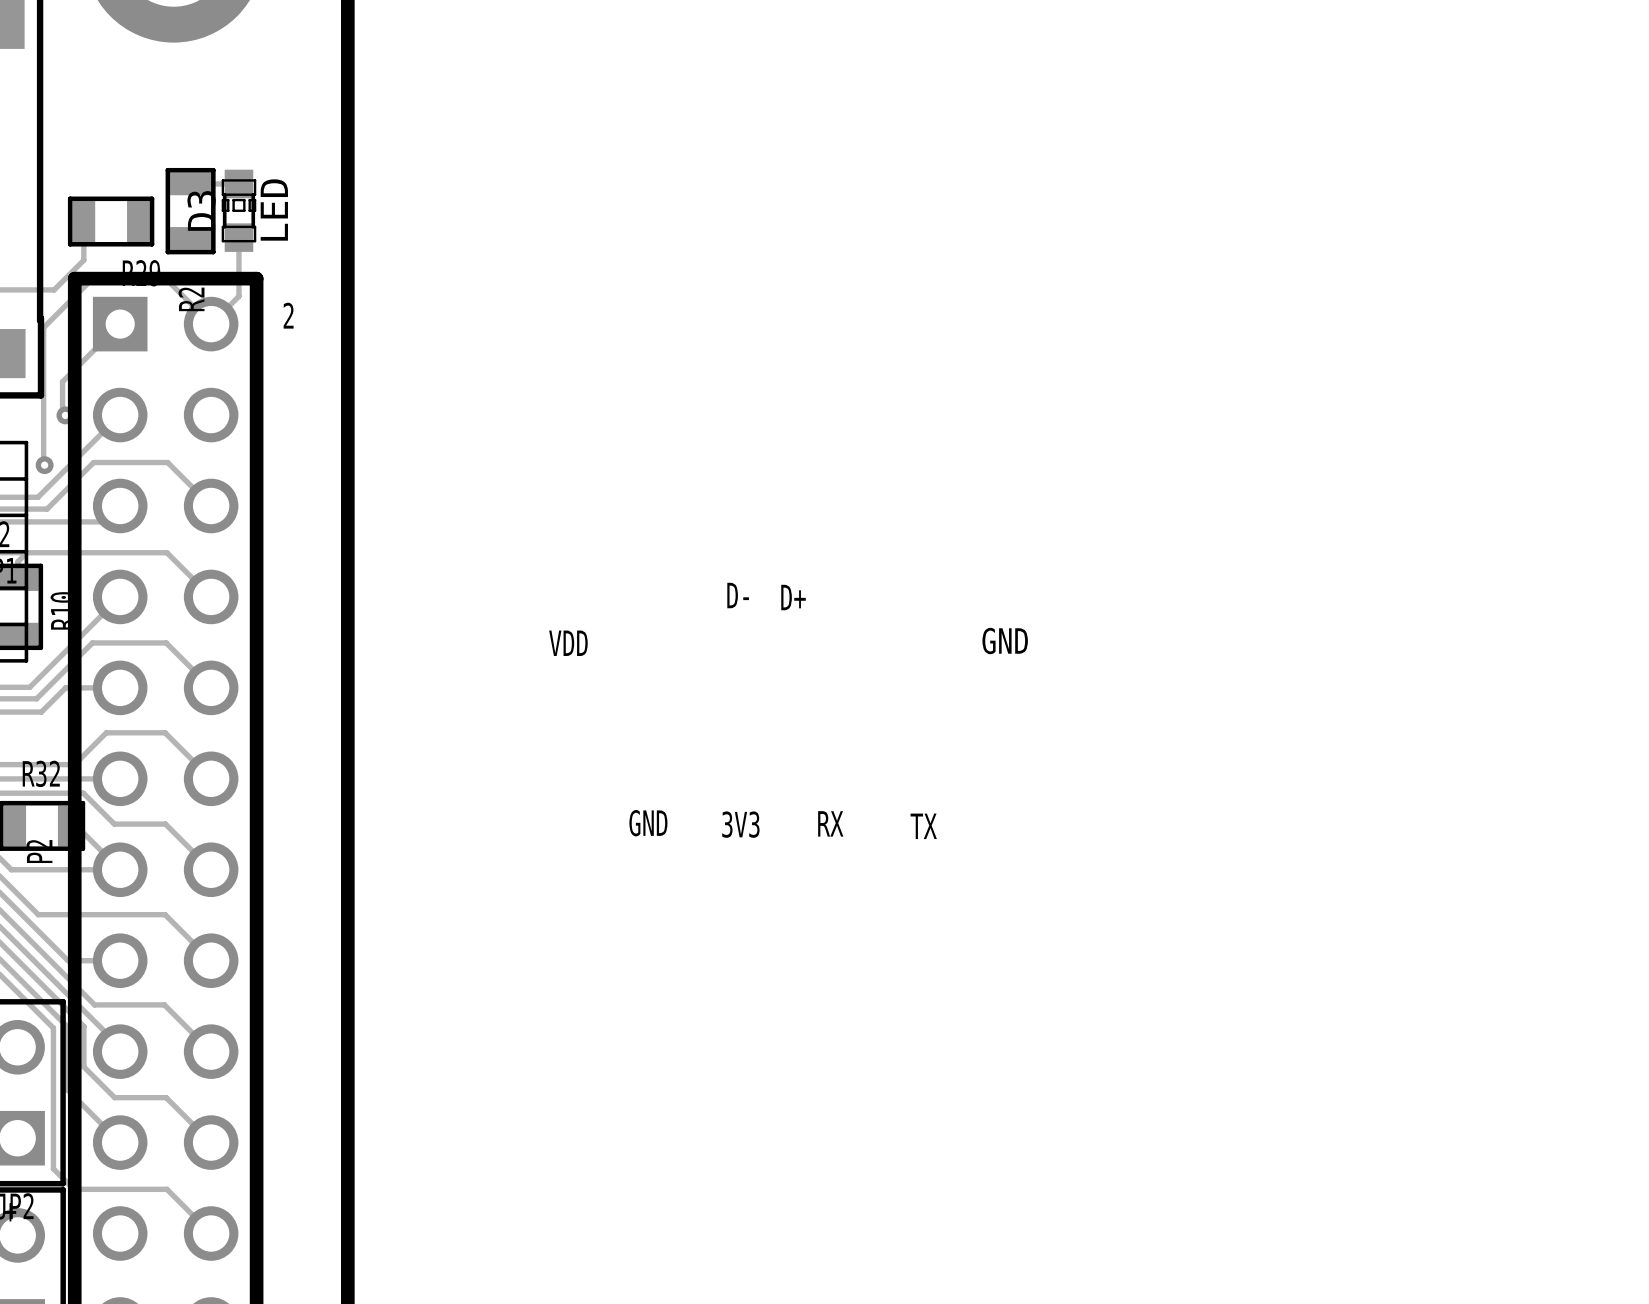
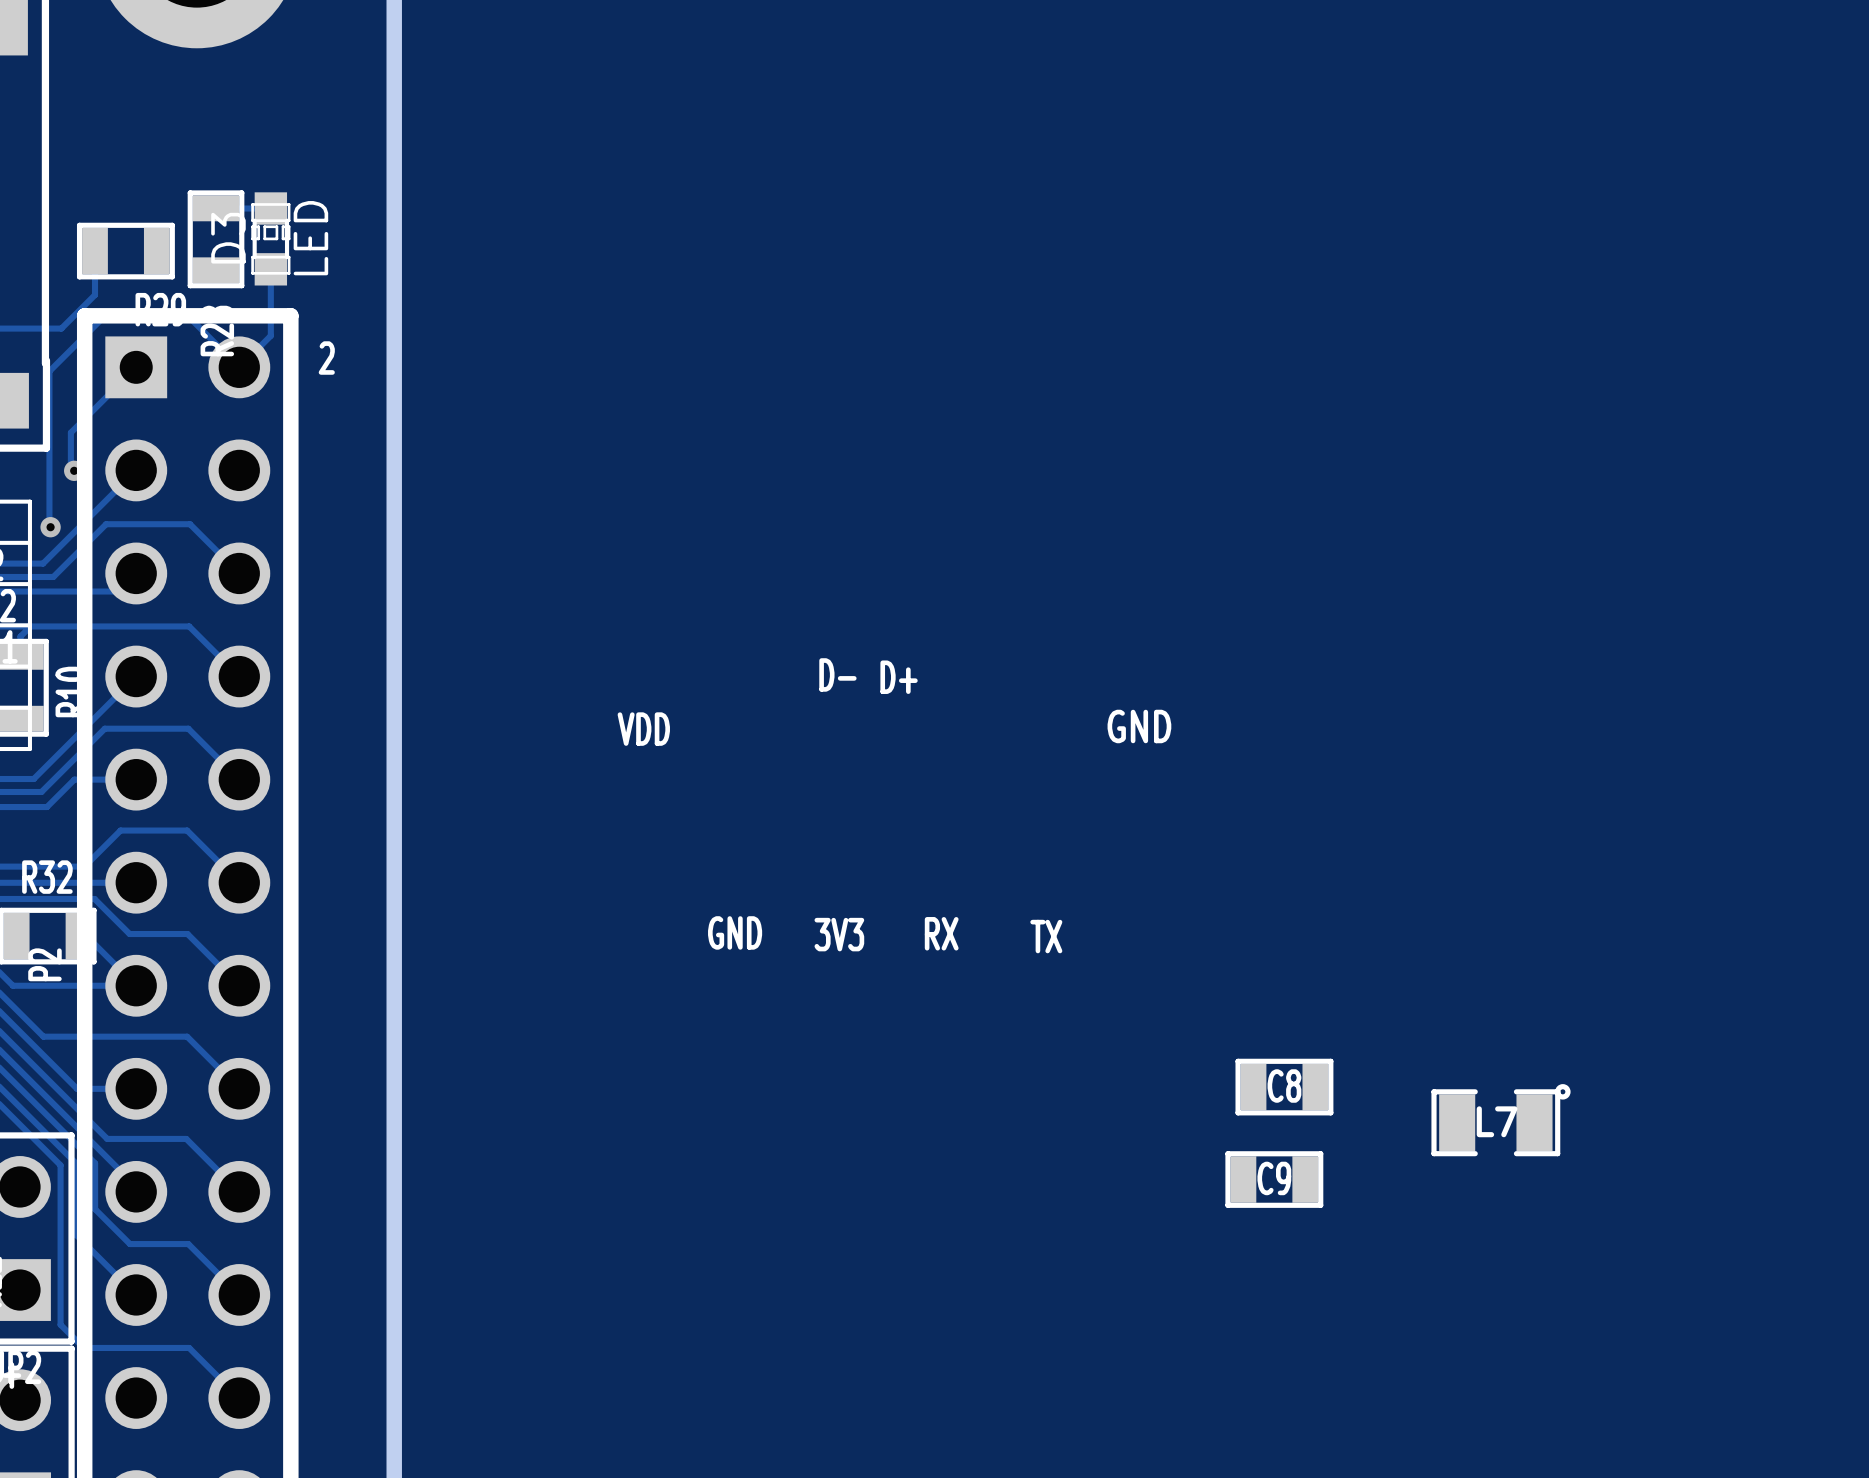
C8: none -> (1284, 1087)
L7: none -> (1501, 1120)
C9: none -> (1274, 1179)

